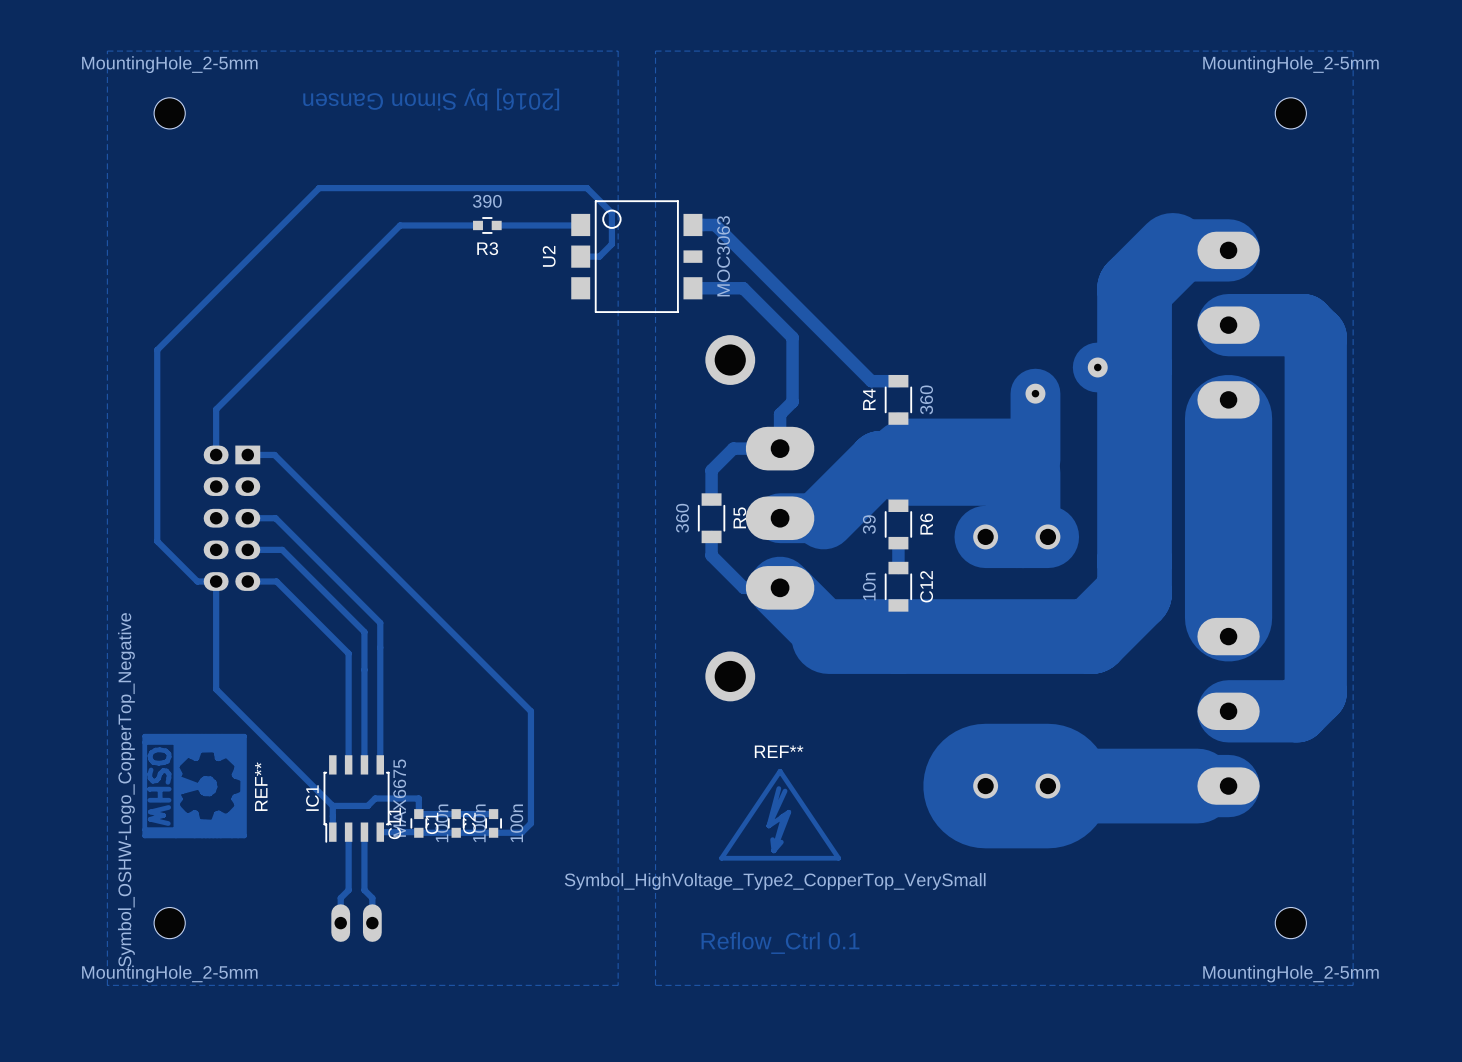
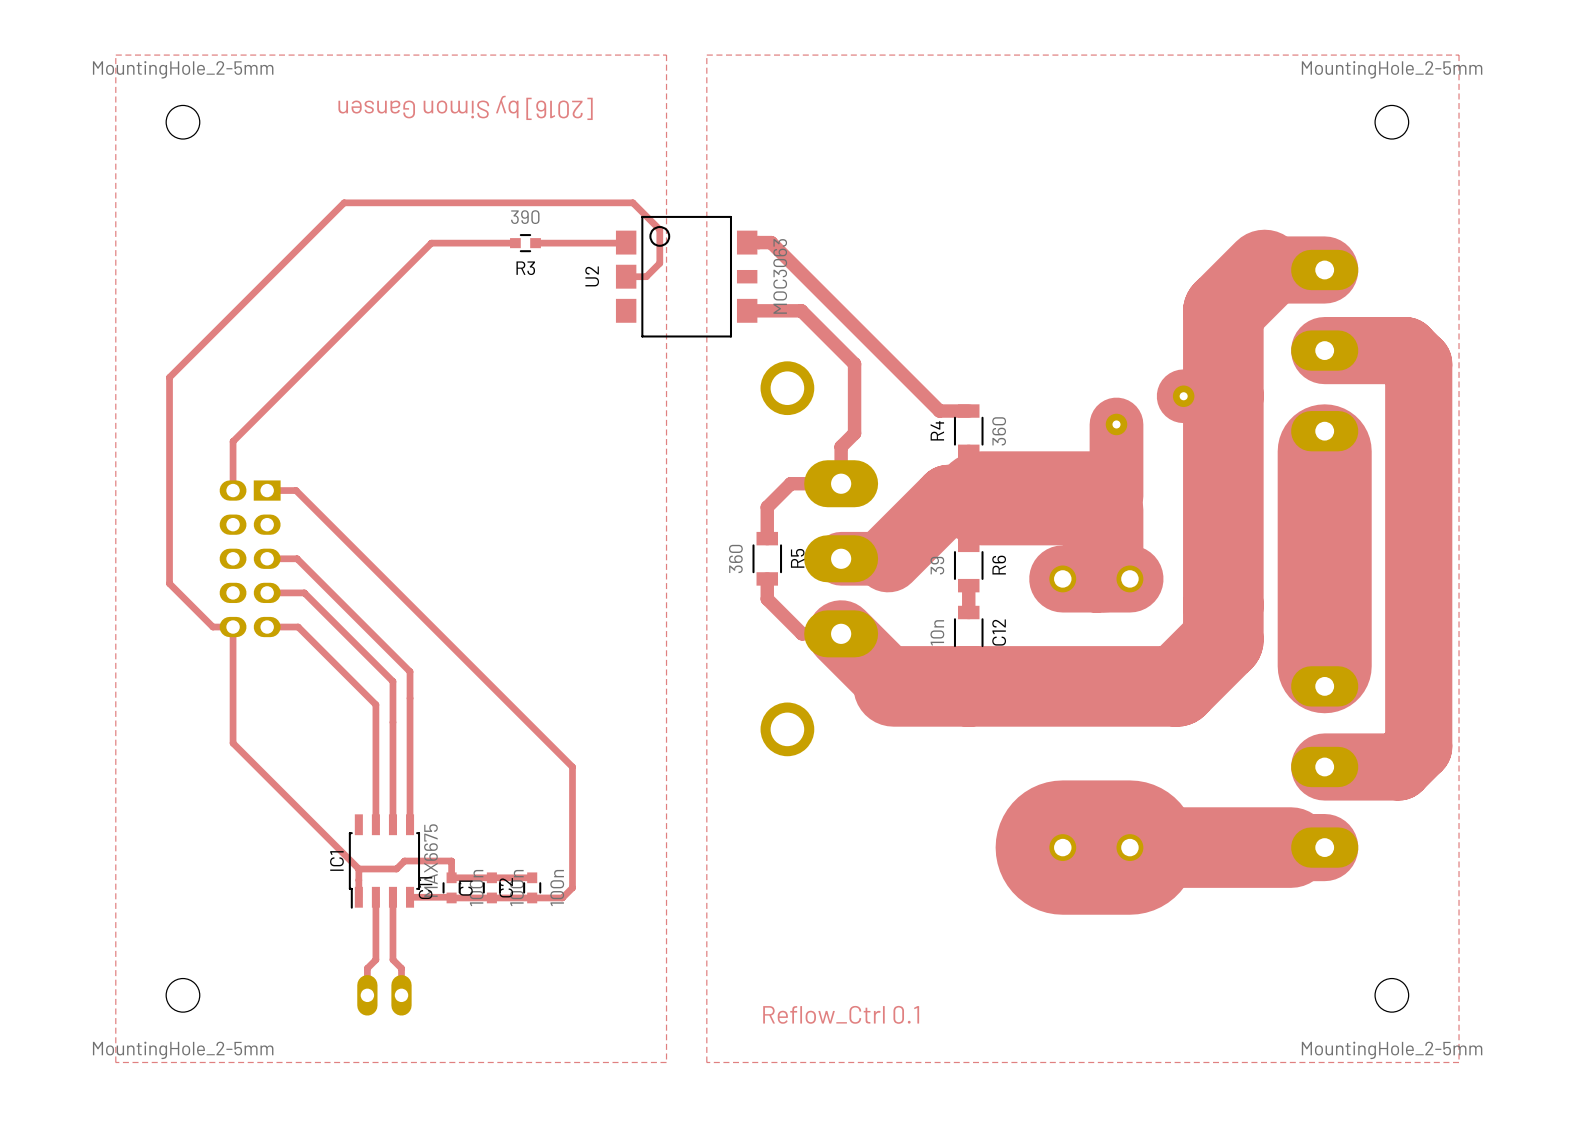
REF**: Symbol_OSHW-Logo_CopperTop_Negative (194, 786) -> none
REF**: Symbol_HighVoltage_Type2_CopperTop_VerySmall (780, 814) -> none

